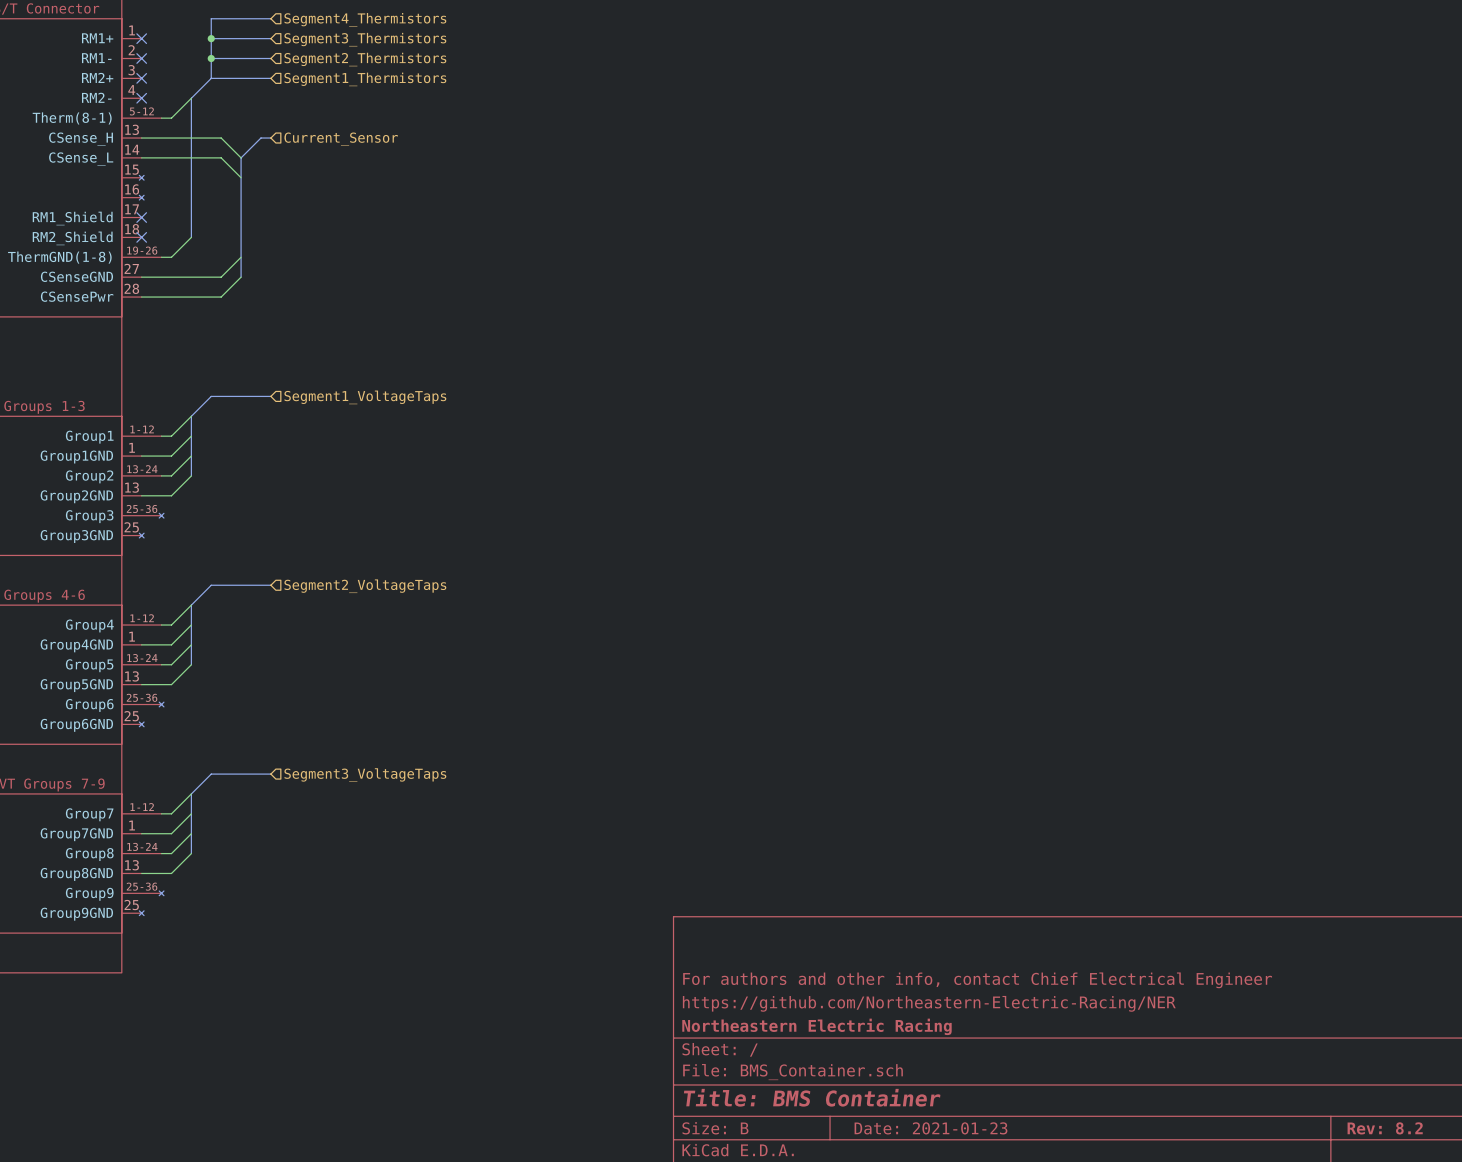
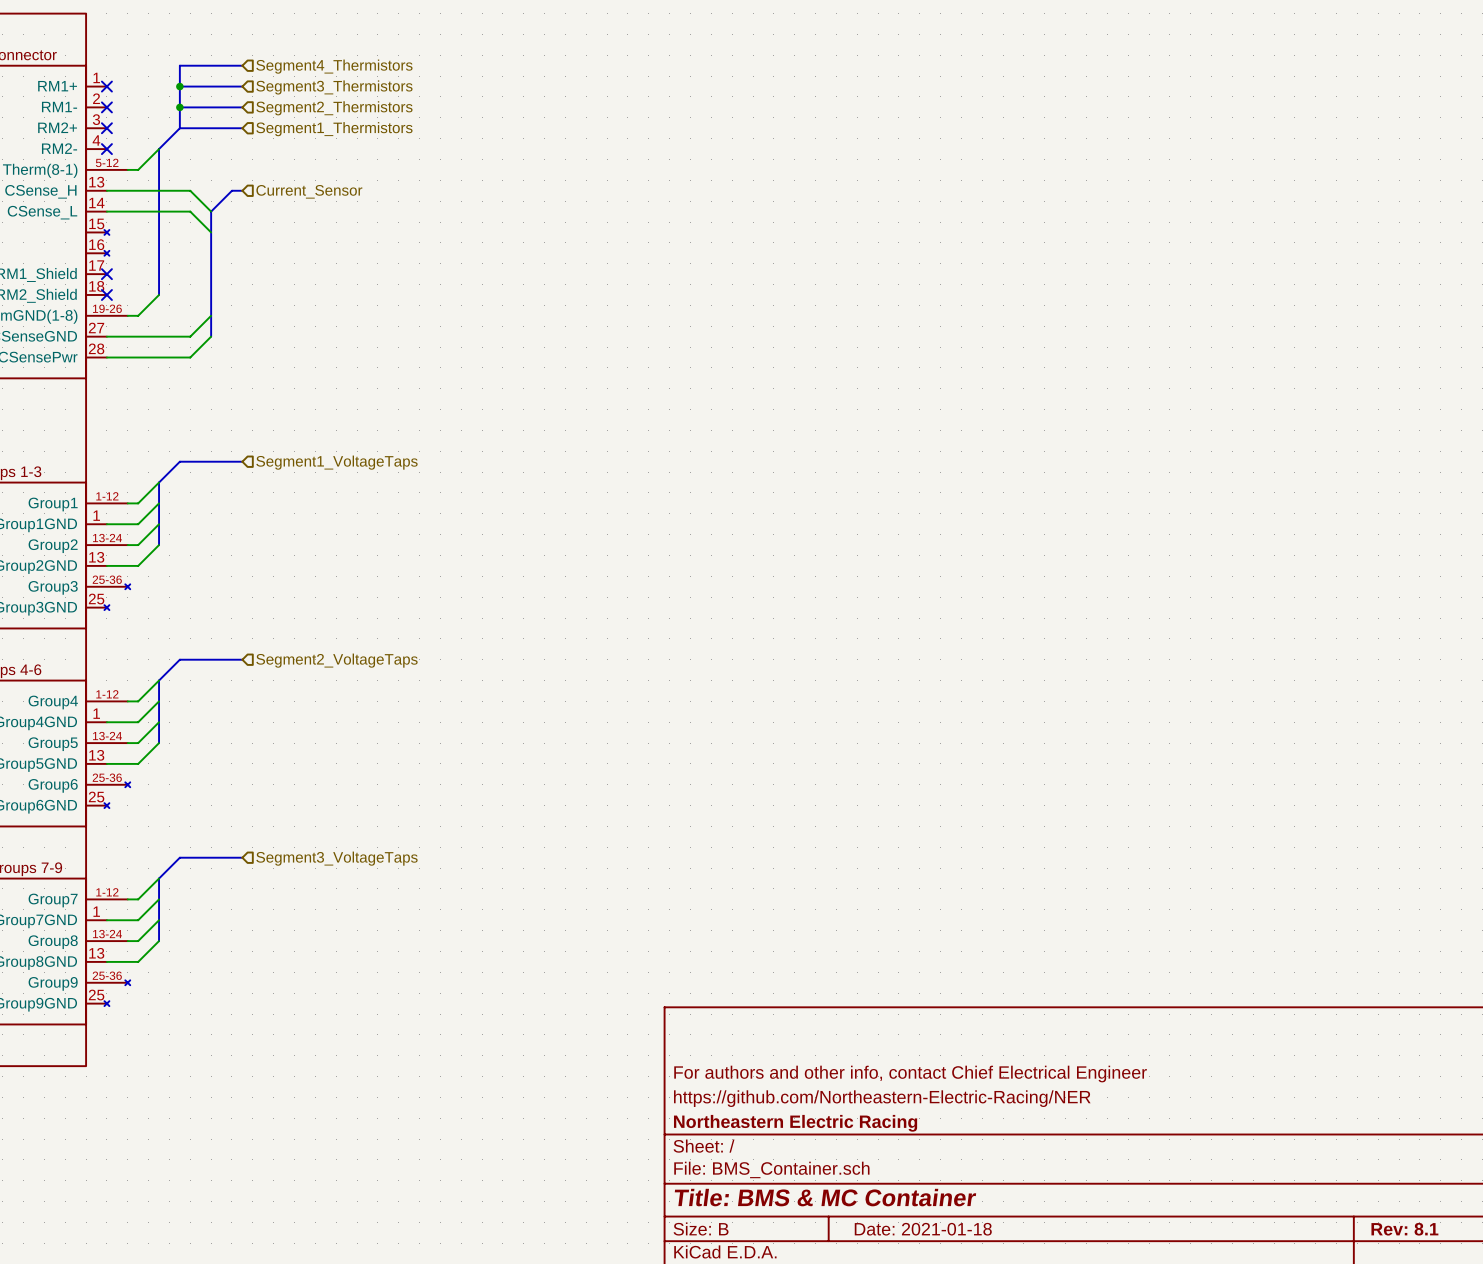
title block: Title: BMS Container (812, 1097) -> Title: BMS & MC Container (825, 1197)
title block: Date: 2021-01-23 (930, 1128) -> Date: 2021-01-18 (923, 1229)
title block: Rev: 8.2 (1385, 1128) -> Rev: 8.1 (1404, 1229)

